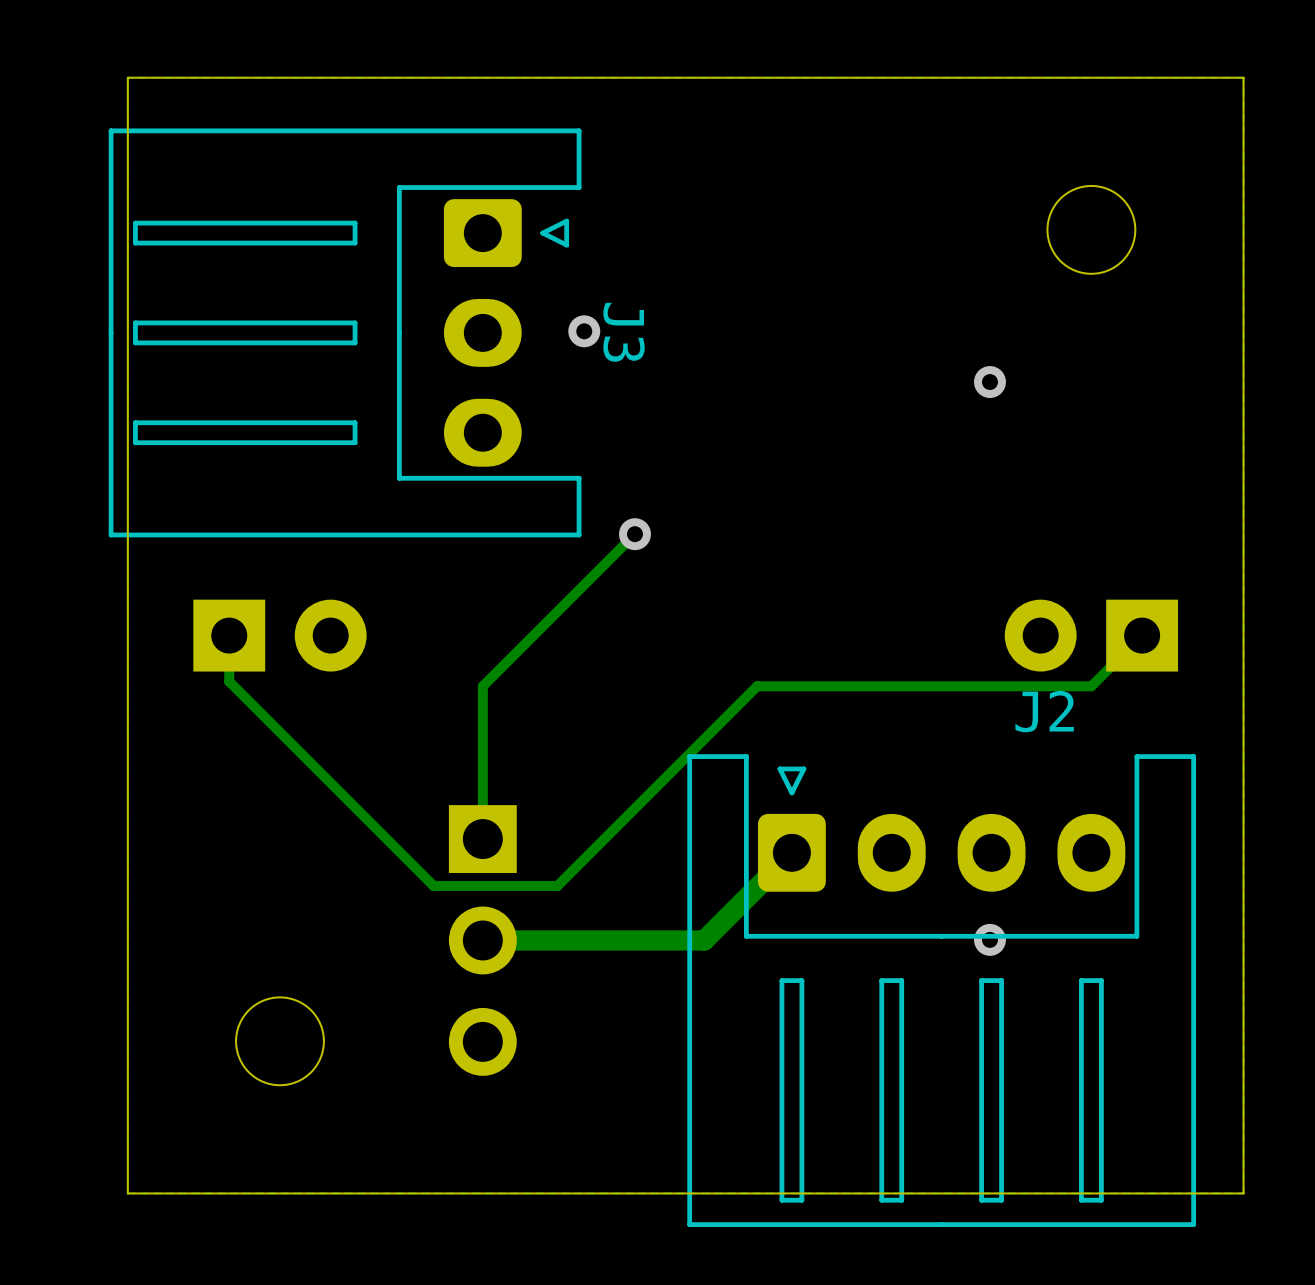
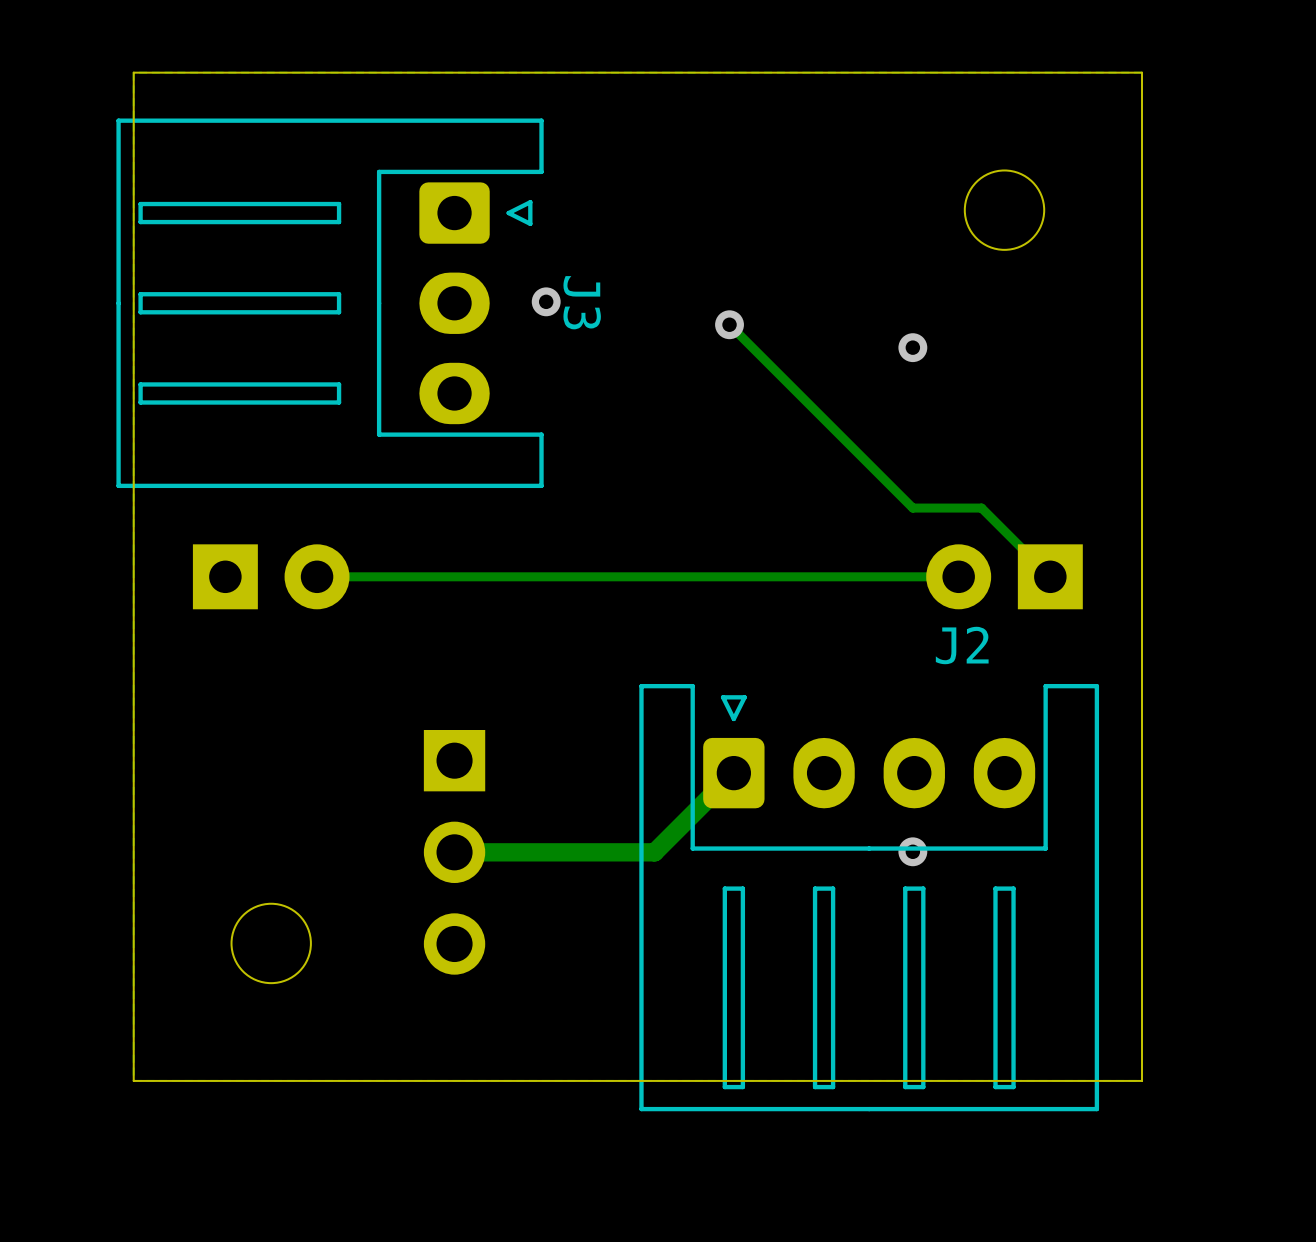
track: (634, 534) (482, 686) (482, 839) -> none
via position: (634, 534) -> (729, 324)
track: none -> (958, 576) (317, 576)
track: (1142, 635) (1091, 686) (757, 686) (557, 885) (433, 885) (229, 681) (229, 635) -> (1050, 576) (981, 508) (912, 508) (729, 324)

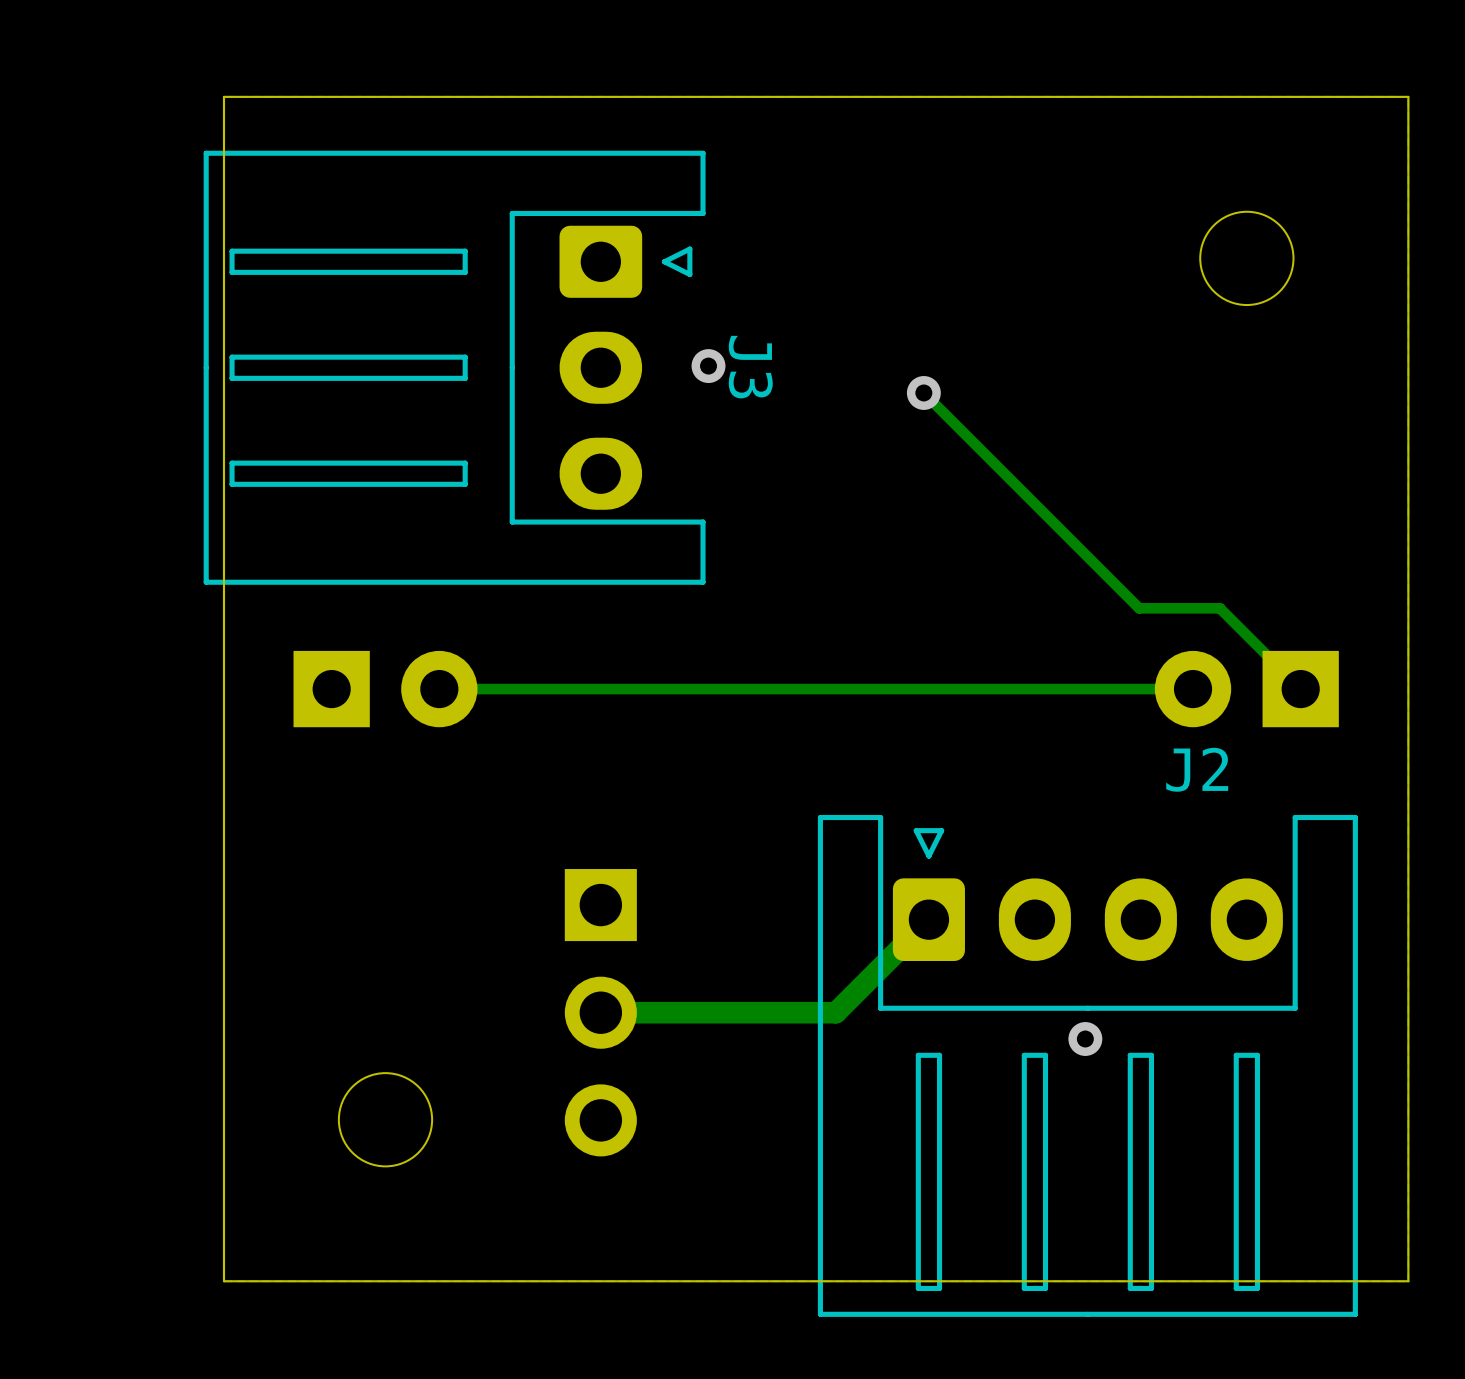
via: (912, 347) -> none
via position: (912, 851) -> (1085, 1039)

